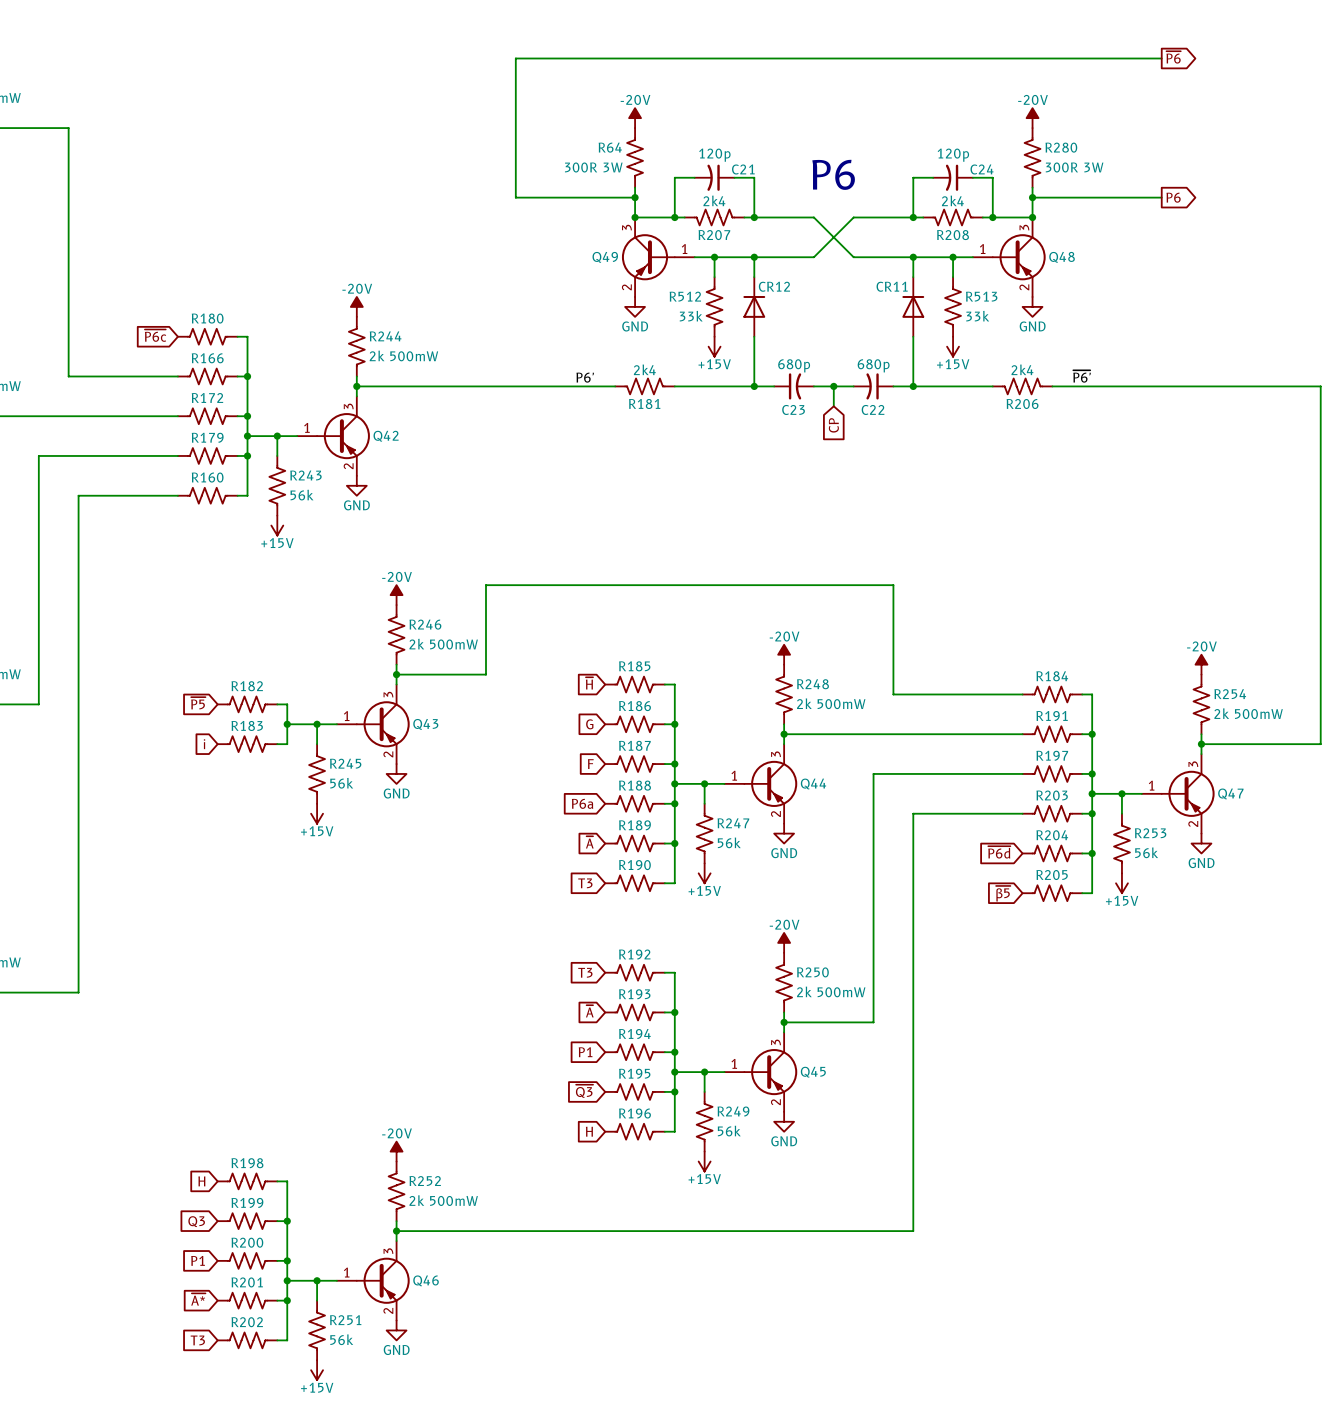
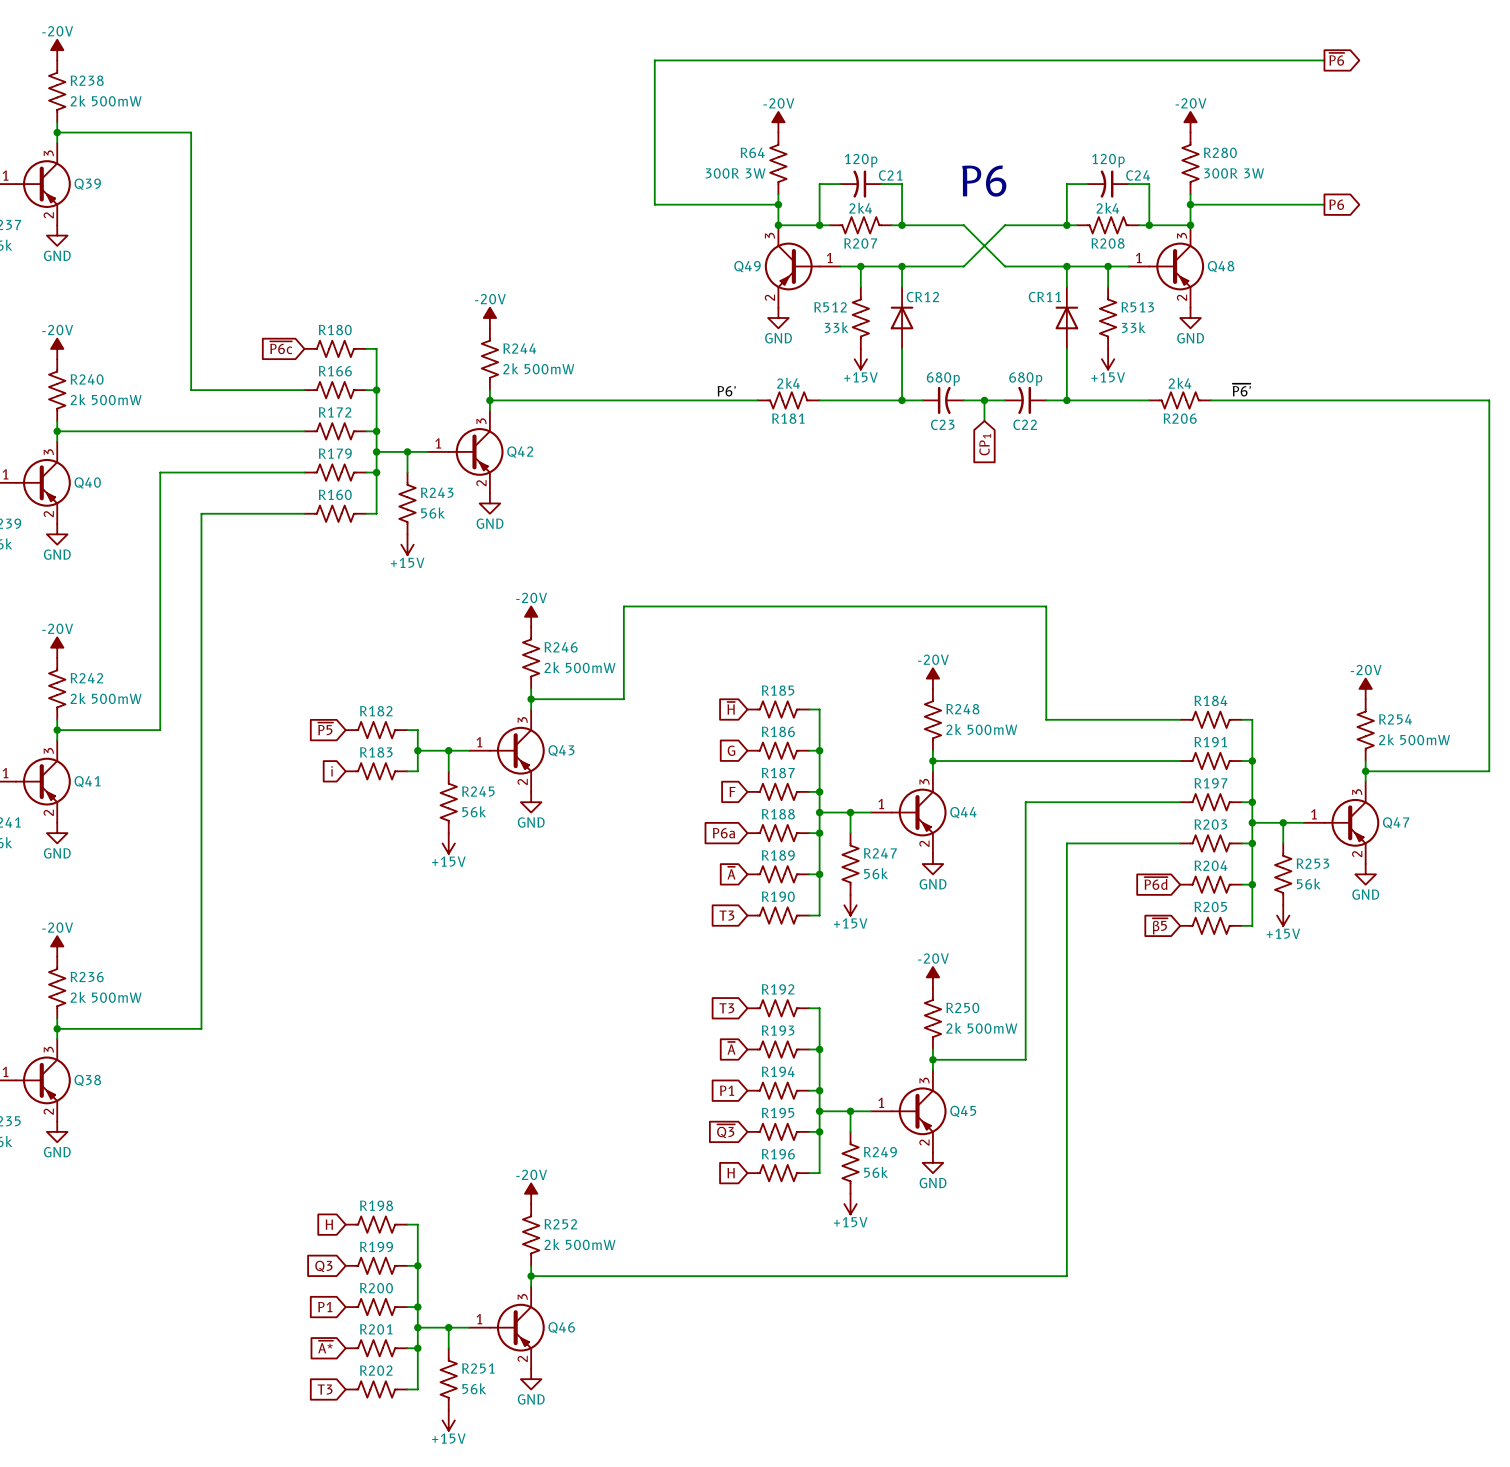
global label: CP (833, 425) -> CP1 (985, 444)

